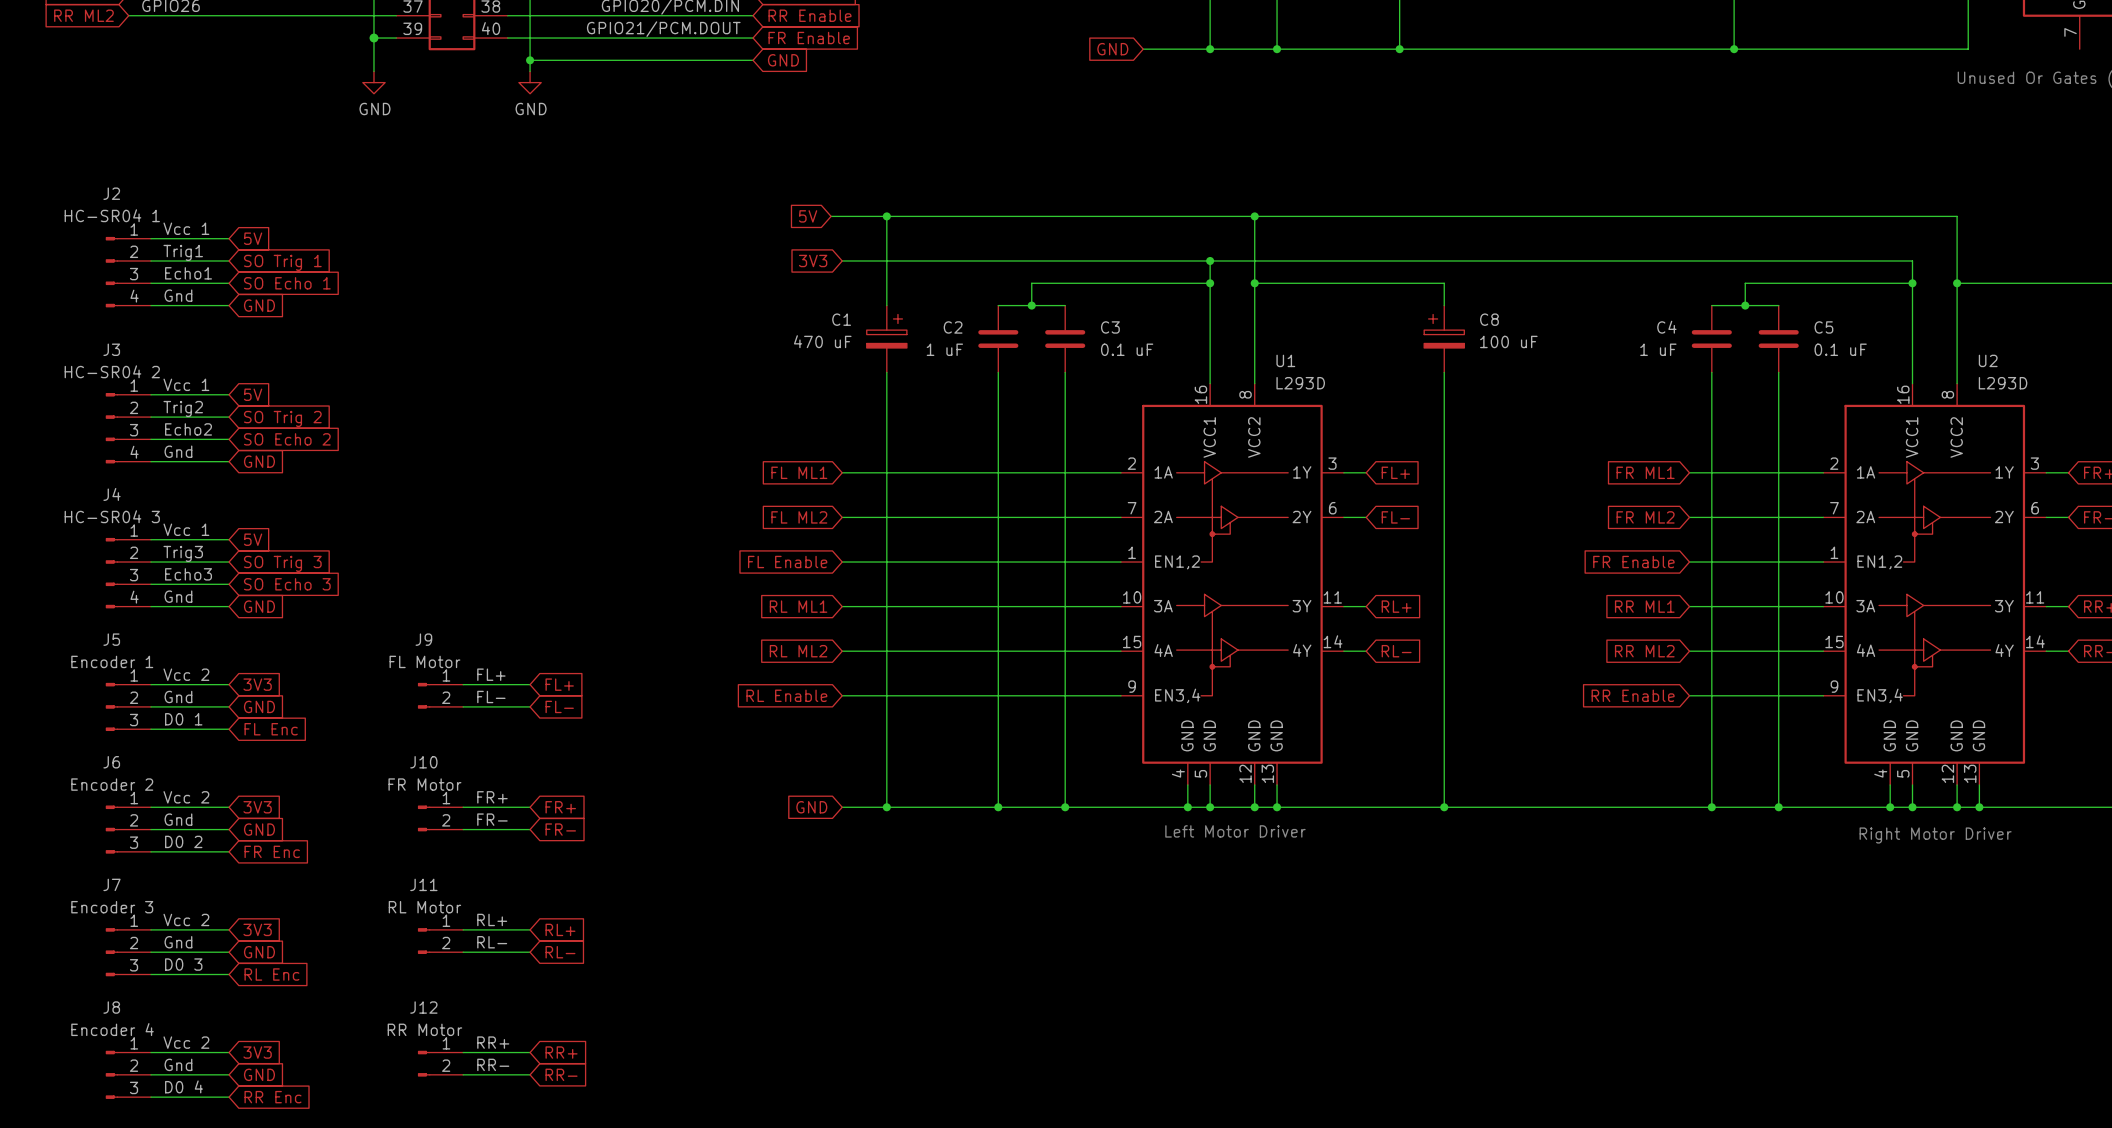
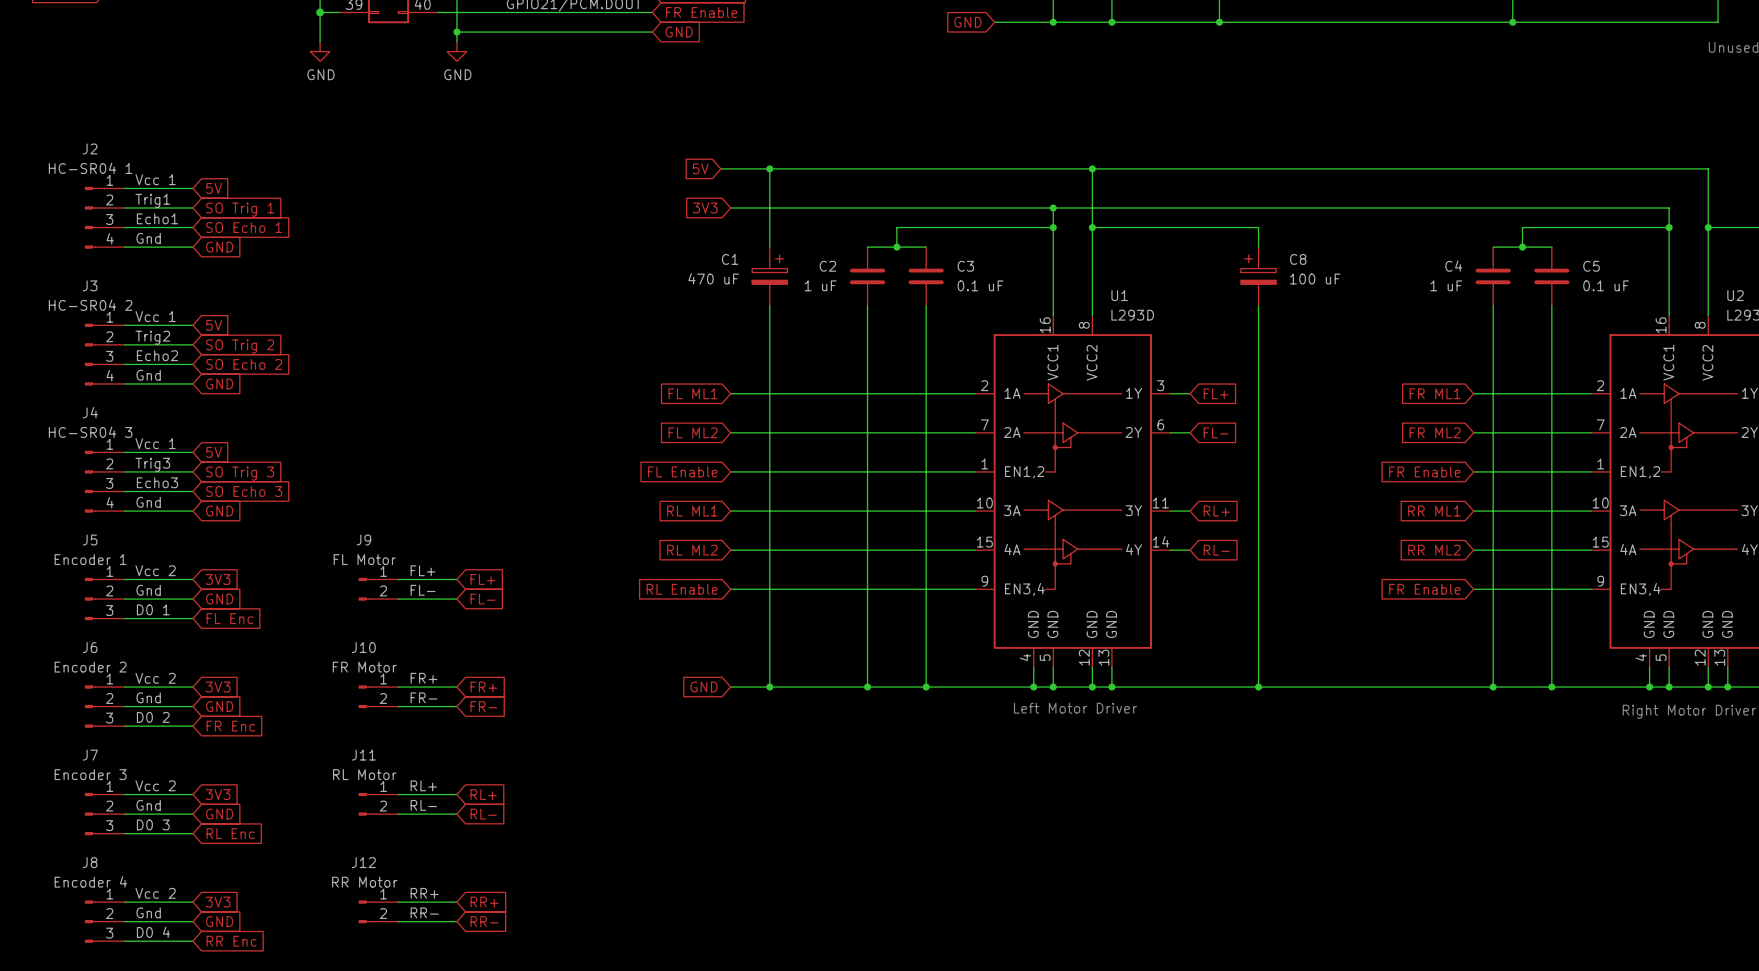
global label: RR Enable (1633, 695) -> FR Enable (1424, 589)

